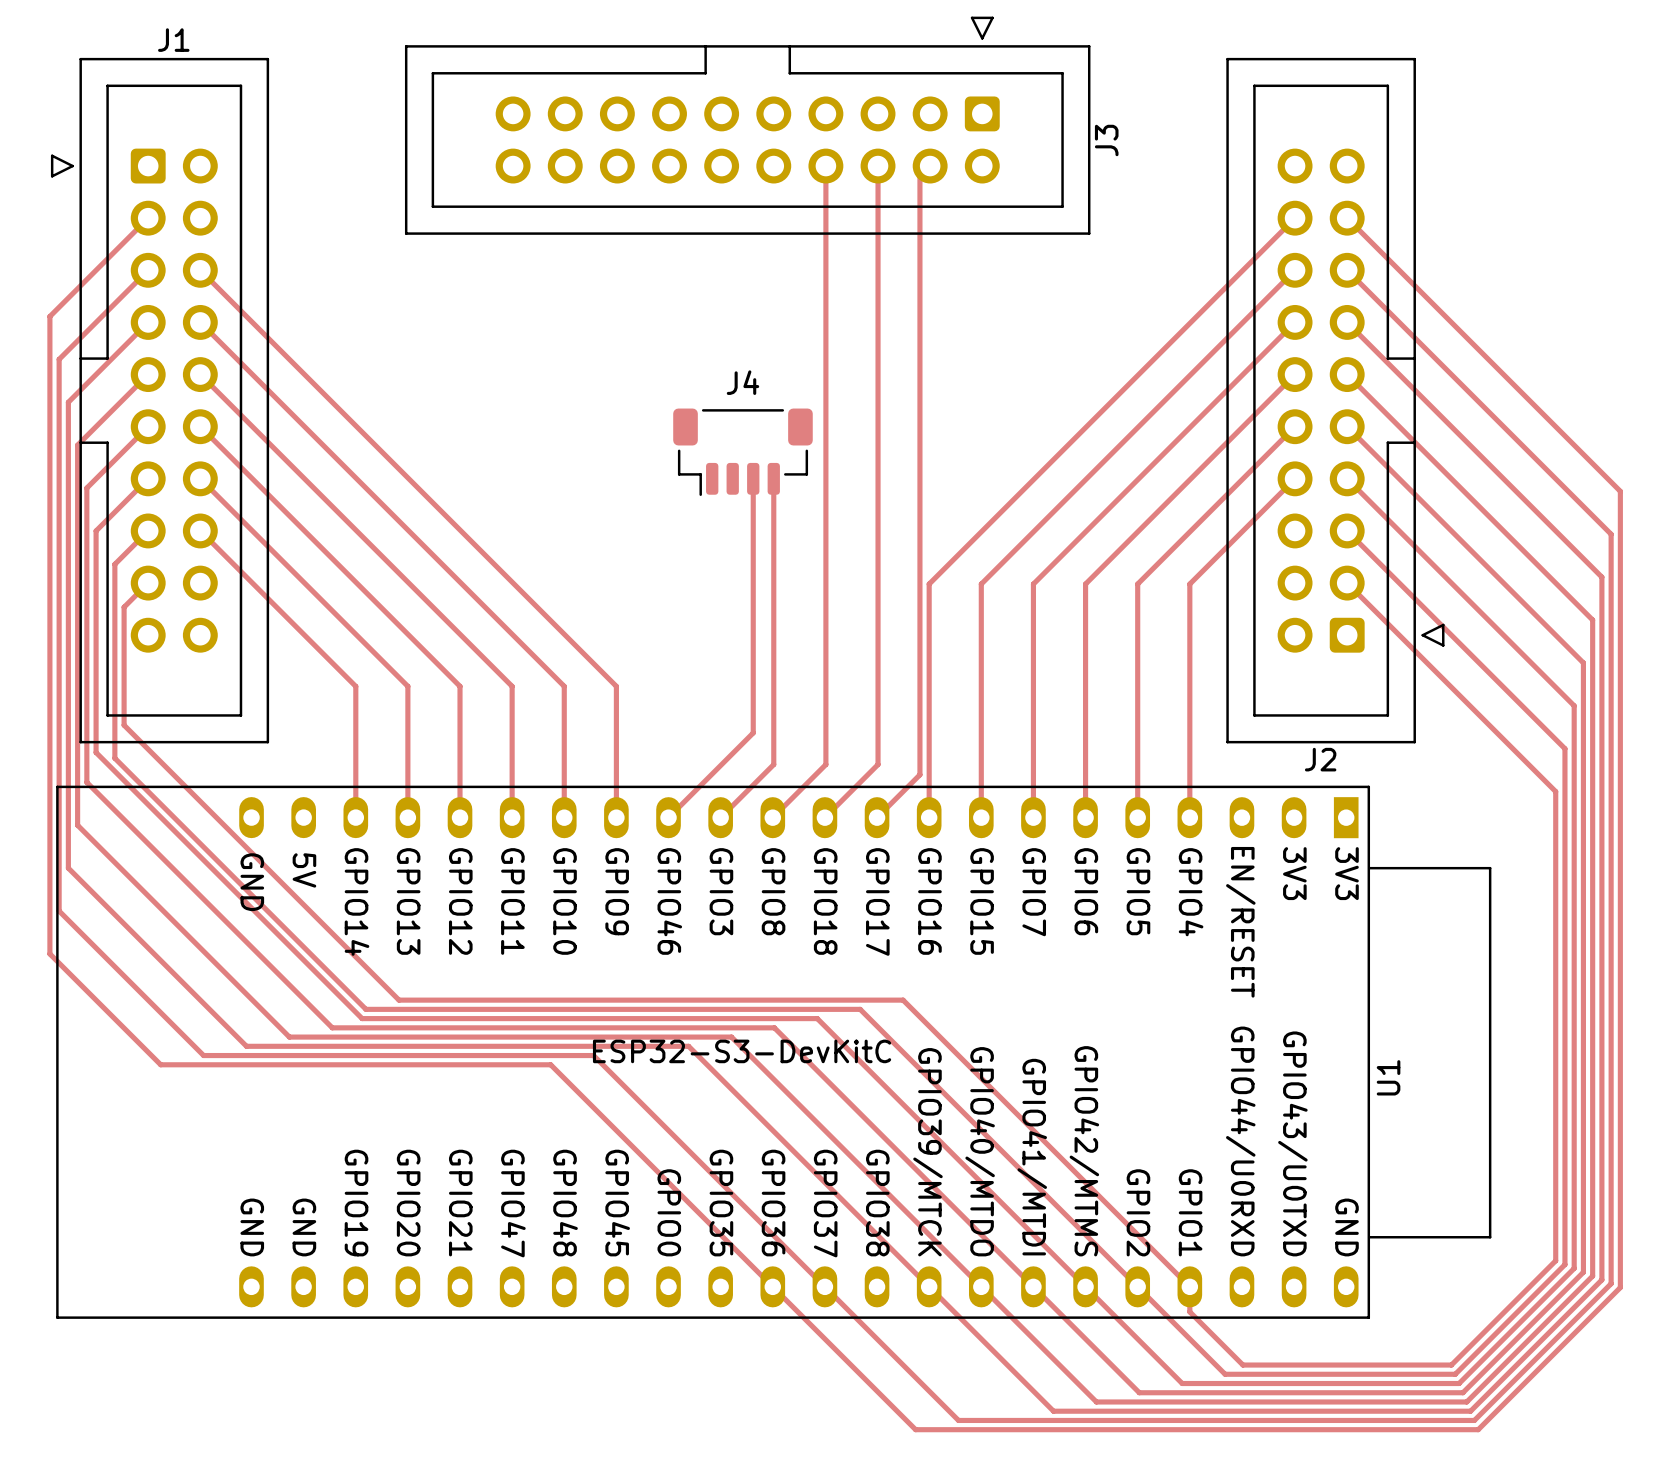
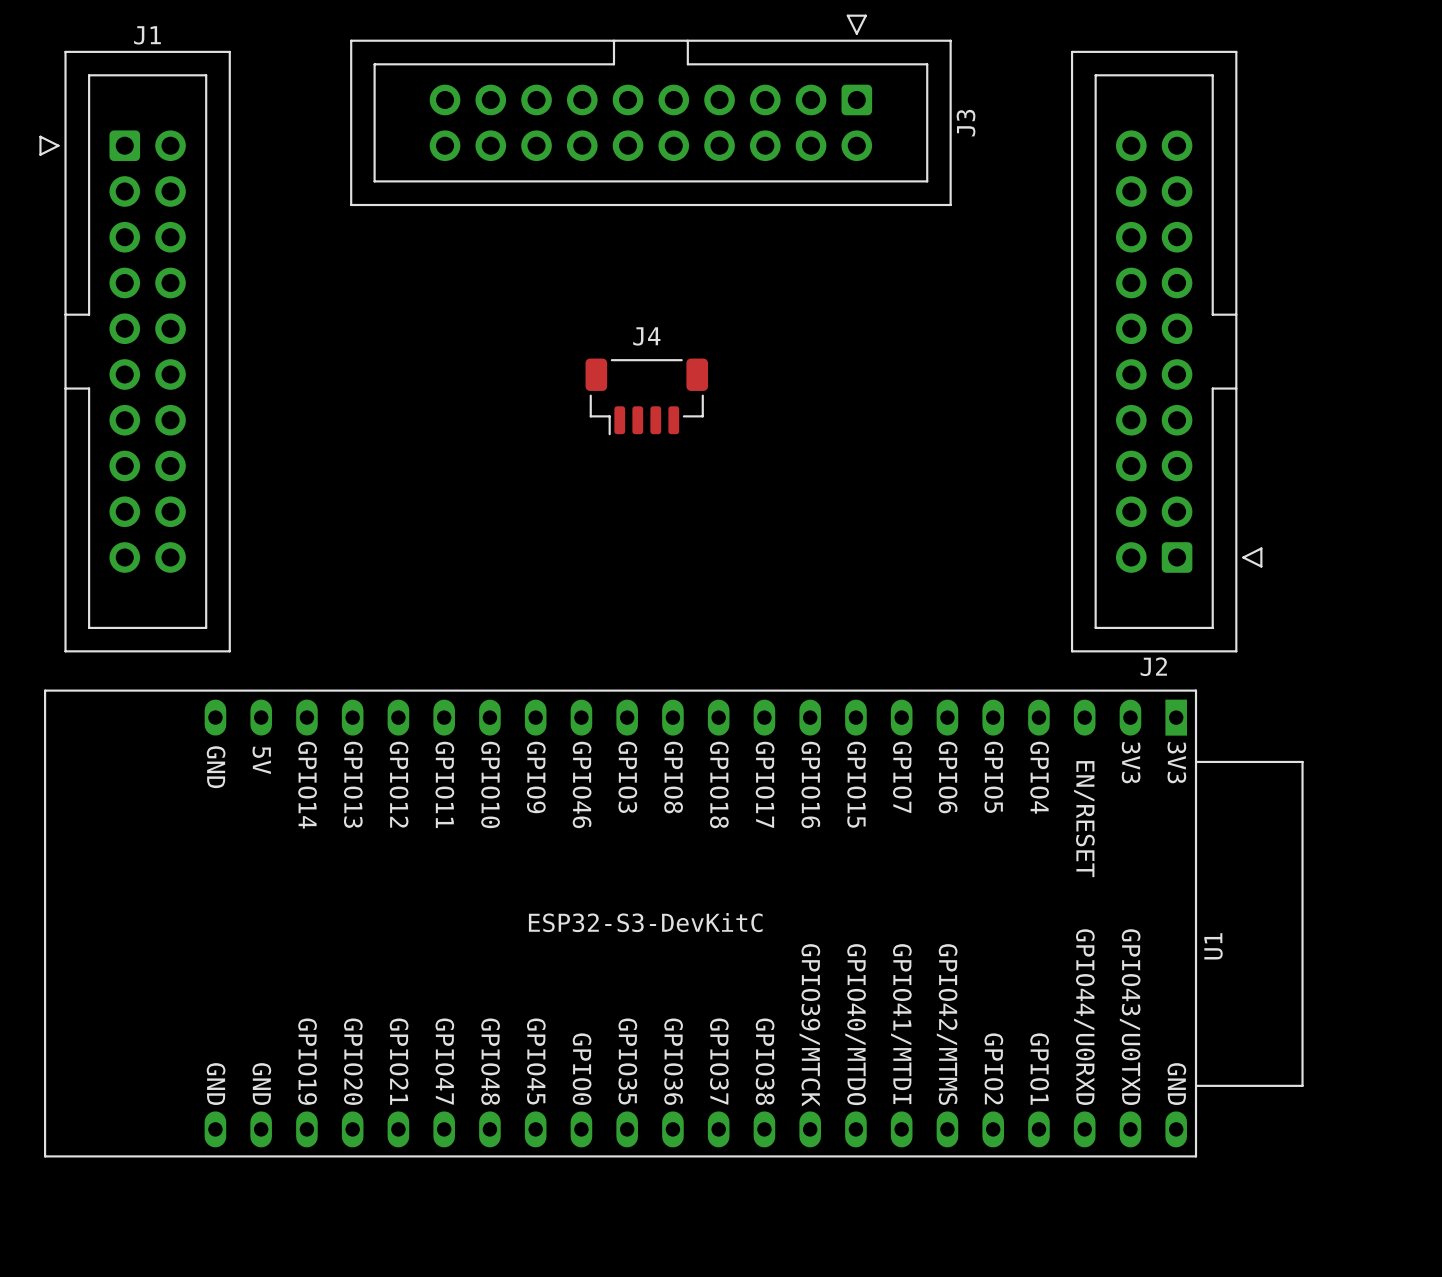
top track: (825, 166) (825, 764) (772, 817) -> none
top track: (878, 166) (878, 764) (824, 817) -> none
top track: (930, 166) (919, 176) (919, 774) (877, 817) -> none
top track: (148, 218) (49, 316) (49, 953) (160, 1064) (550, 1064) (915, 1429) (1478, 1429) (1620, 1287) (1620, 491) (1347, 218) -> none
top track: (1295, 218) (929, 584) (929, 817) -> none
top track: (148, 270) (59, 359) (59, 911) (203, 1055) (593, 1055) (958, 1420) (1474, 1420) (1611, 1283) (1611, 534) (1347, 270) -> none
top track: (200, 270) (616, 686) (616, 817) -> none
top track: (1295, 270) (981, 584) (981, 817) -> none
top track: (148, 322) (68, 402) (68, 868) (246, 1046) (688, 1046) (1053, 1411) (1470, 1411) (1601, 1279) (1601, 577) (1347, 322) -> none
top track: (200, 322) (564, 686) (564, 817) -> none
top track: (1295, 322) (1033, 584) (1033, 817) -> none
top track: (148, 374) (77, 445) (77, 825) (289, 1037) (731, 1037) (1096, 1401) (1466, 1401) (1592, 1276) (1592, 620) (1347, 374) -> none
top track: (200, 374) (512, 686) (512, 817) -> none
top track: (1295, 374) (1085, 584) (1085, 817) -> none
top track: (148, 426) (86, 488) (86, 782) (332, 1027) (774, 1027) (1139, 1392) (1462, 1392) (1583, 1272) (1583, 662) (1347, 426) -> none
top track: (200, 426) (460, 686) (460, 817) -> none
top track: (1295, 426) (1137, 584) (1137, 817) -> none
top track: (148, 478) (96, 530) (96, 752) (362, 1018) (817, 1018) (1182, 1383) (1459, 1383) (1574, 1268) (1574, 705) (1347, 478) -> none
top track: (200, 478) (407, 686) (407, 817) -> none
top track: (753, 478) (753, 732) (668, 817) -> none
top track: (773, 478) (773, 764) (720, 817) -> none
top track: (1295, 478) (1189, 584) (1189, 817) -> none
top track: (148, 530) (114, 564) (114, 758) (365, 1009) (860, 1009) (1225, 1374) (1455, 1374) (1564, 1264) (1564, 748) (1347, 530) -> none
top track: (200, 530) (355, 686) (355, 817) -> none
top track: (148, 583) (124, 607) (124, 725) (399, 1000) (903, 1000) (1189, 1286) (1189, 1311) (1242, 1365) (1451, 1365) (1555, 1260) (1555, 791) (1347, 583) -> none

